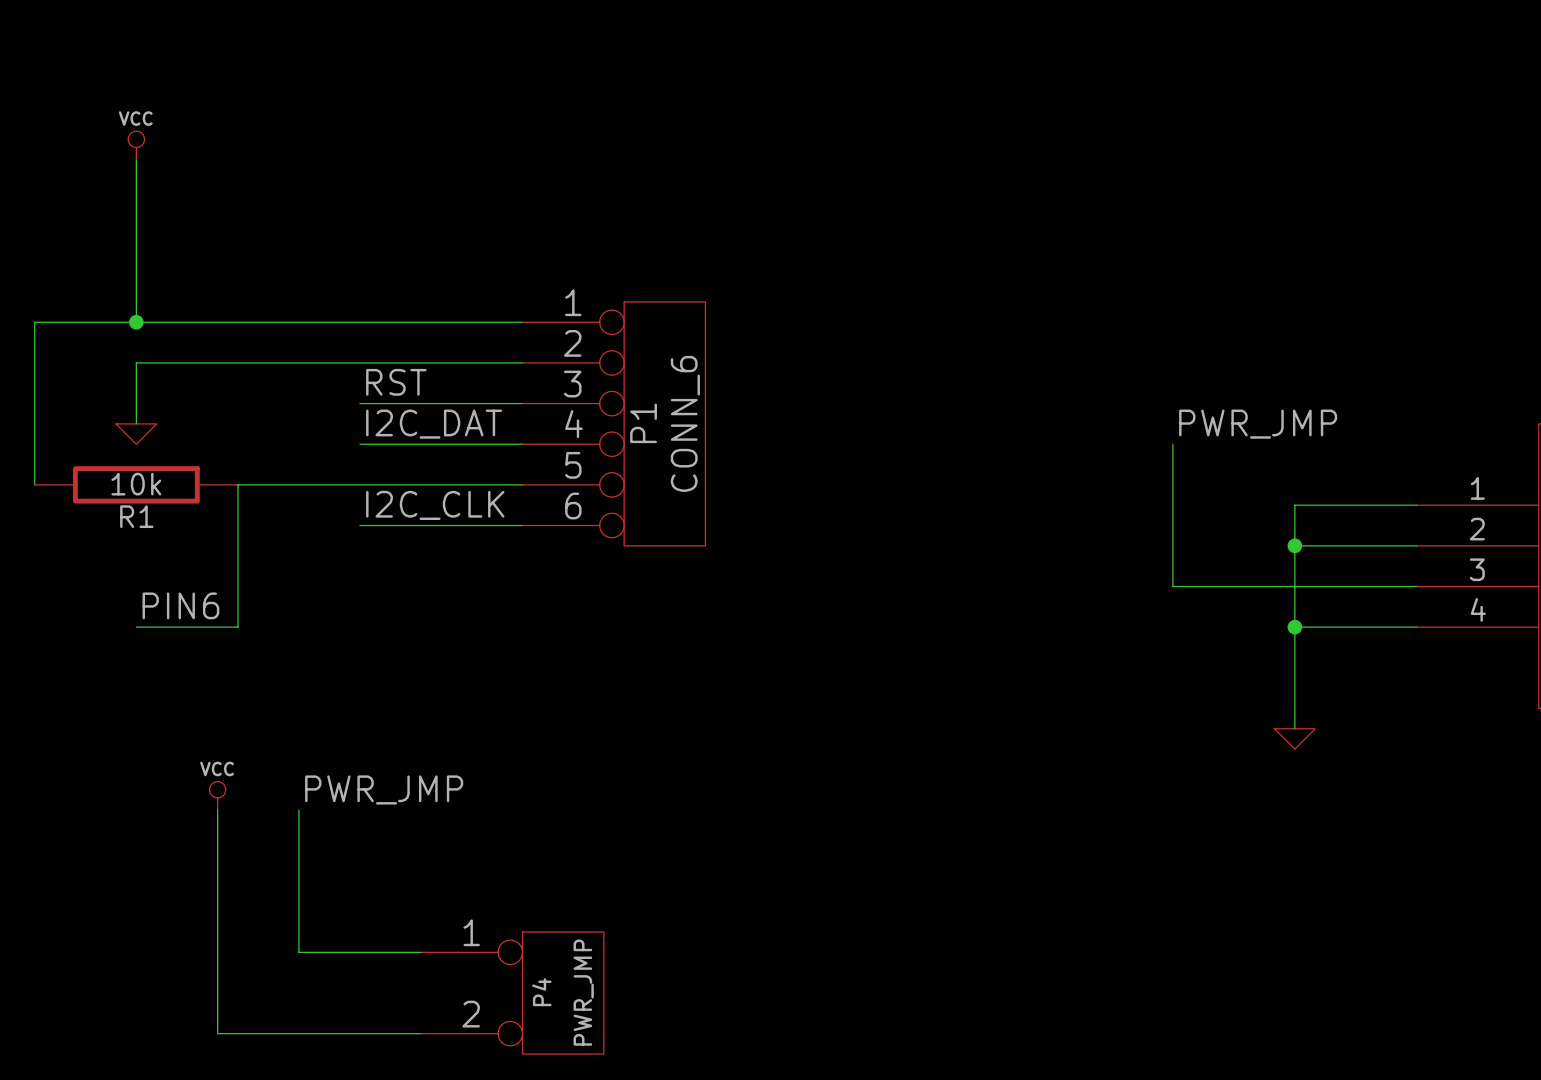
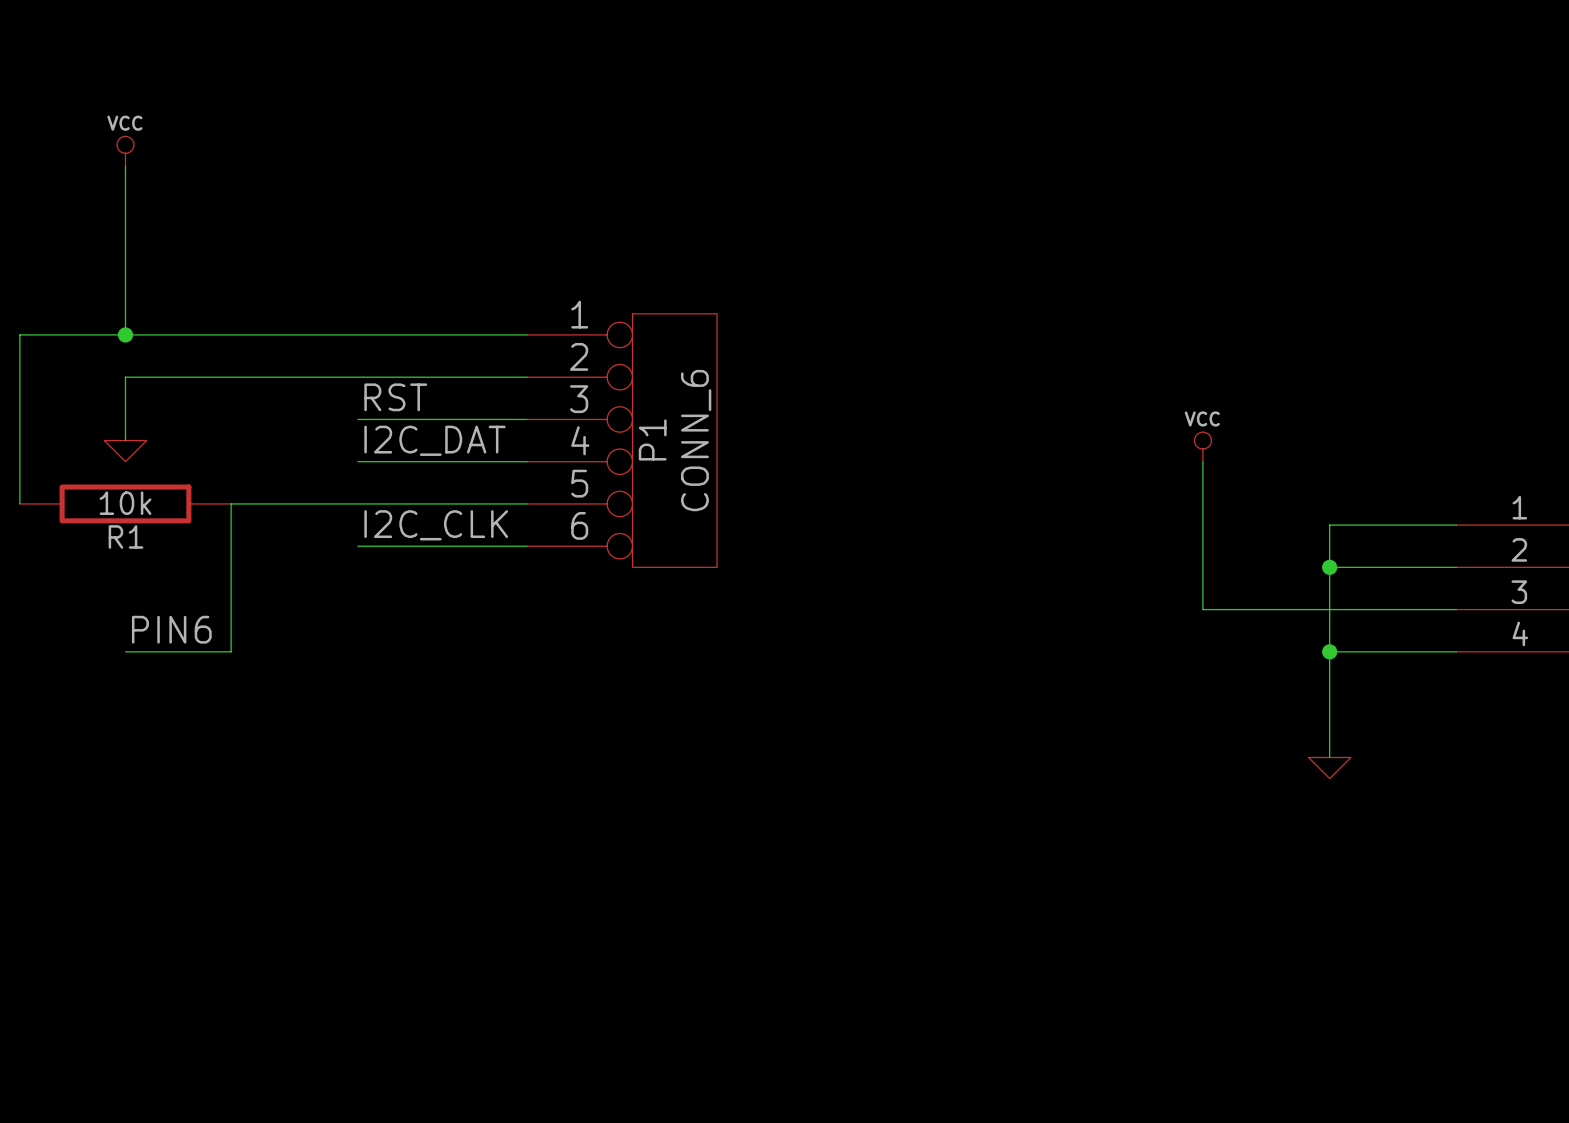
label: PWR_JMP (1258, 424) -> none
power symbol: none -> VCC (1202, 446)
label: PWR_JMP (384, 789) -> none
power symbol: VCC (217, 795) -> none
wire: (217, 810) (217, 1033) (420, 1033) -> none
wire: (298, 810) (298, 952) (420, 952) -> none
P4: PWR_JMP (512, 993) -> none

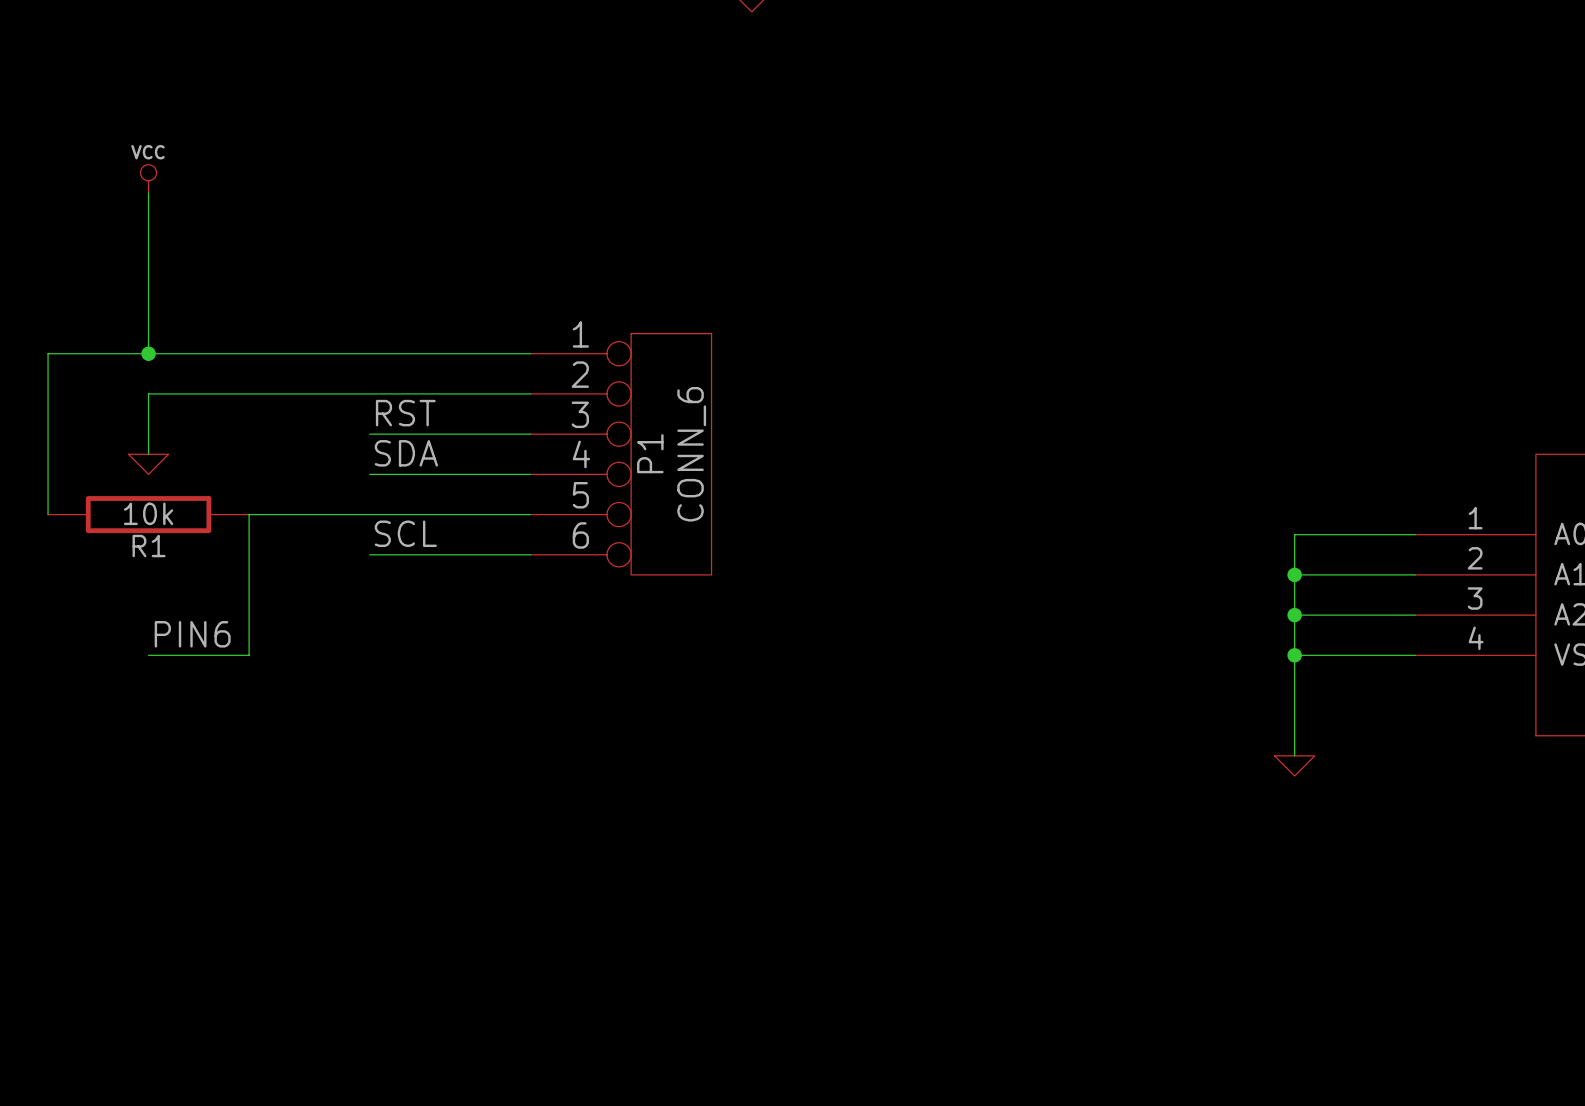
label: I2C_DAT (435, 440) -> SDA (406, 453)
power symbol: VCC (1202, 446) -> none
wire: (1202, 461) (1202, 609) (1329, 609) -> none
label: I2C_CLK (436, 525) -> SCL (405, 533)
junction: none -> (1294, 615)

